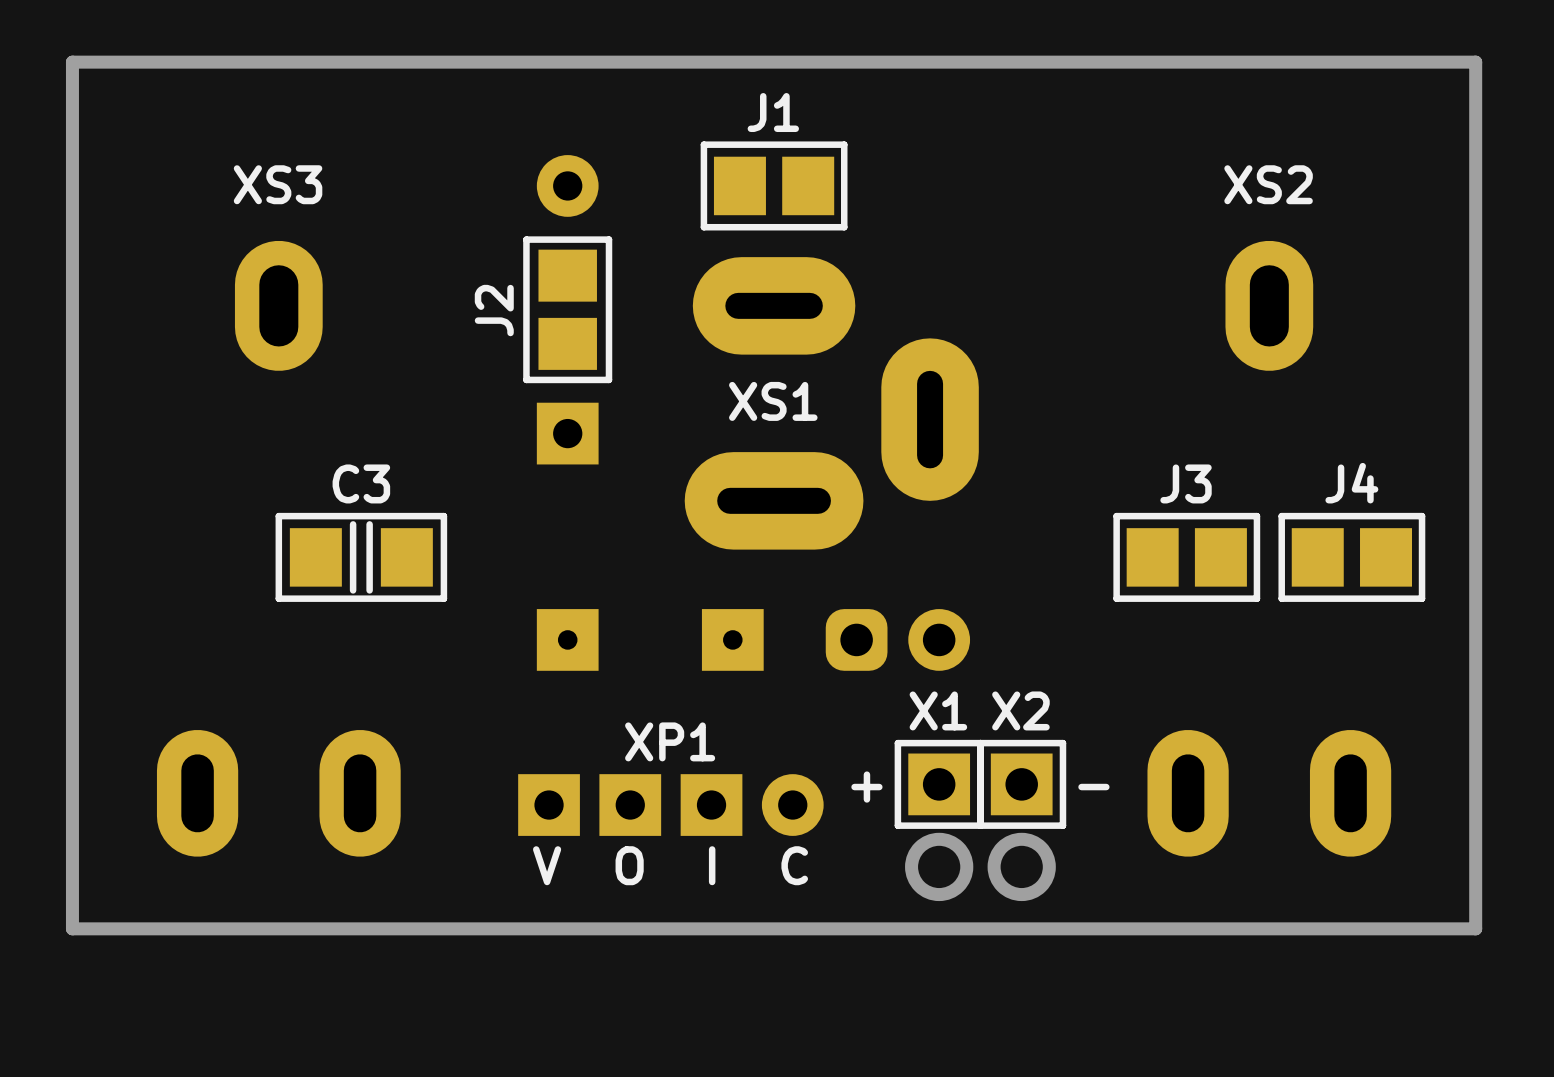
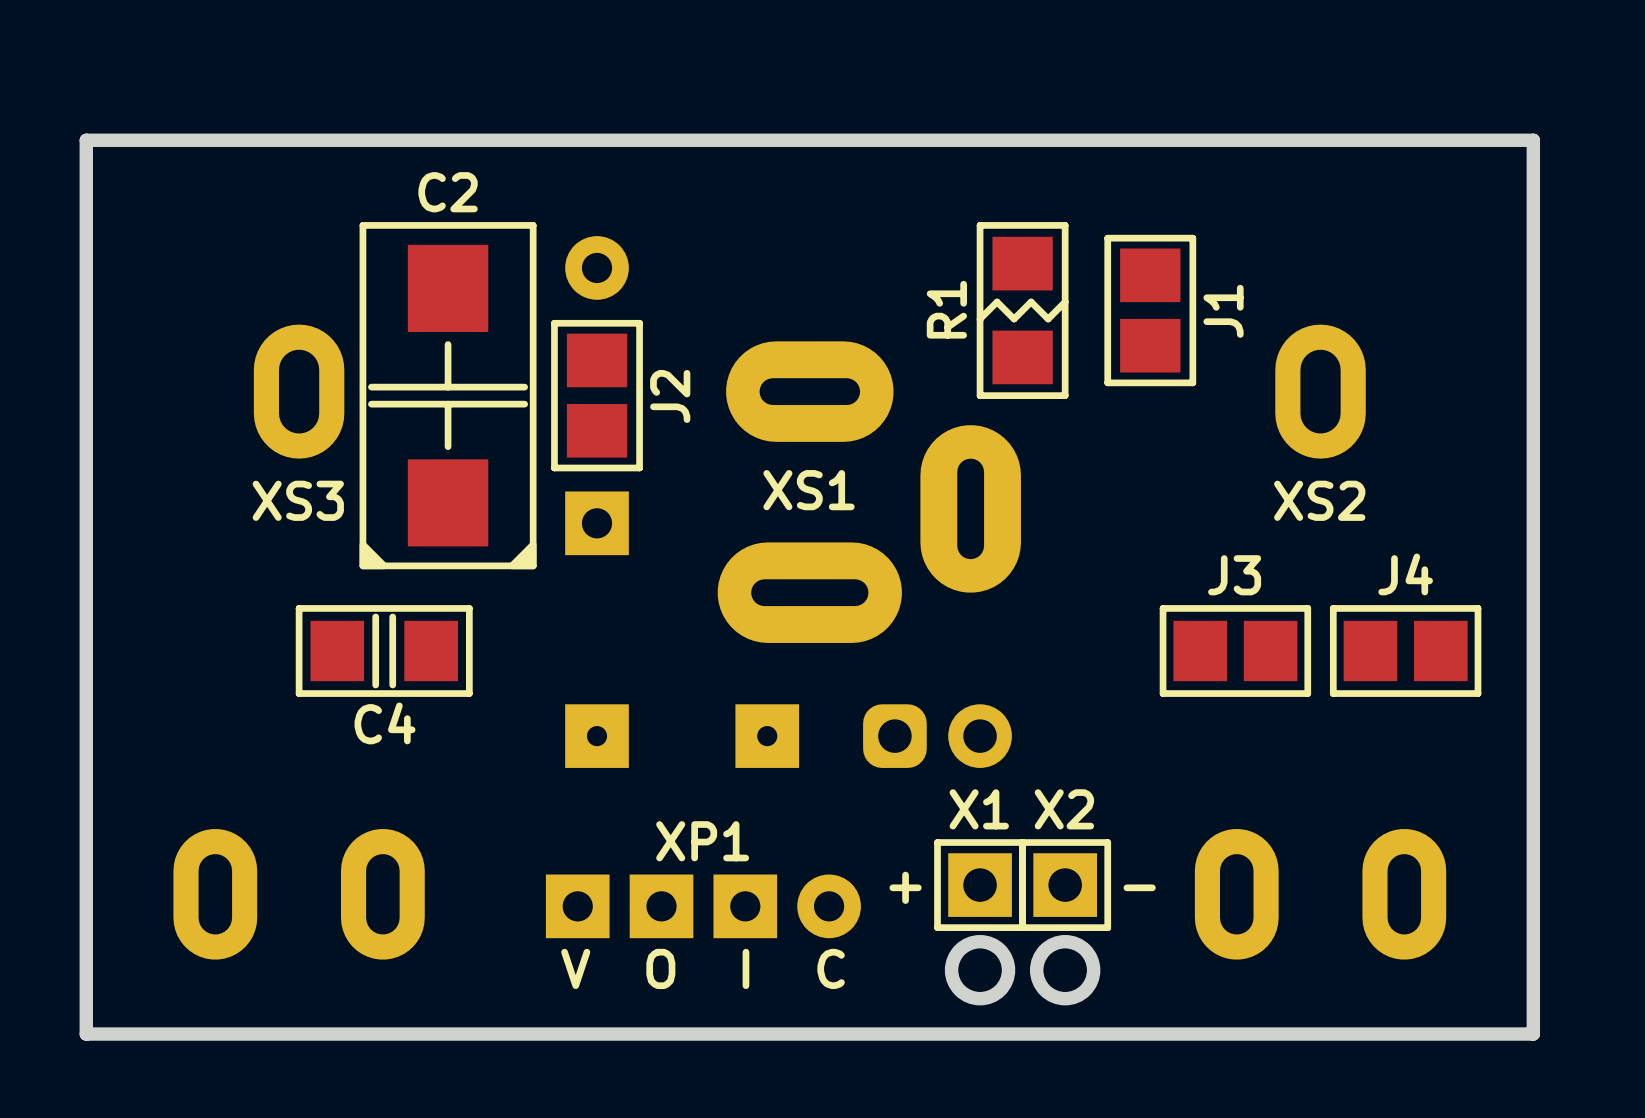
XS3 name position: XS3 (278, 184) -> XS3 (298, 500)
XS2 name position: XS2 (1268, 184) -> XS2 (1319, 500)
J1 rotation: 0° (774, 185) -> 90° clockwise (1150, 310)
J1 position: (774, 185) -> (1150, 310)
R1: none -> (1022, 310)
C2: none -> (448, 395)
J2 name position: J2 (494, 310) -> J2 (670, 396)
C3 name: C3 (361, 483) -> C4 (385, 723)

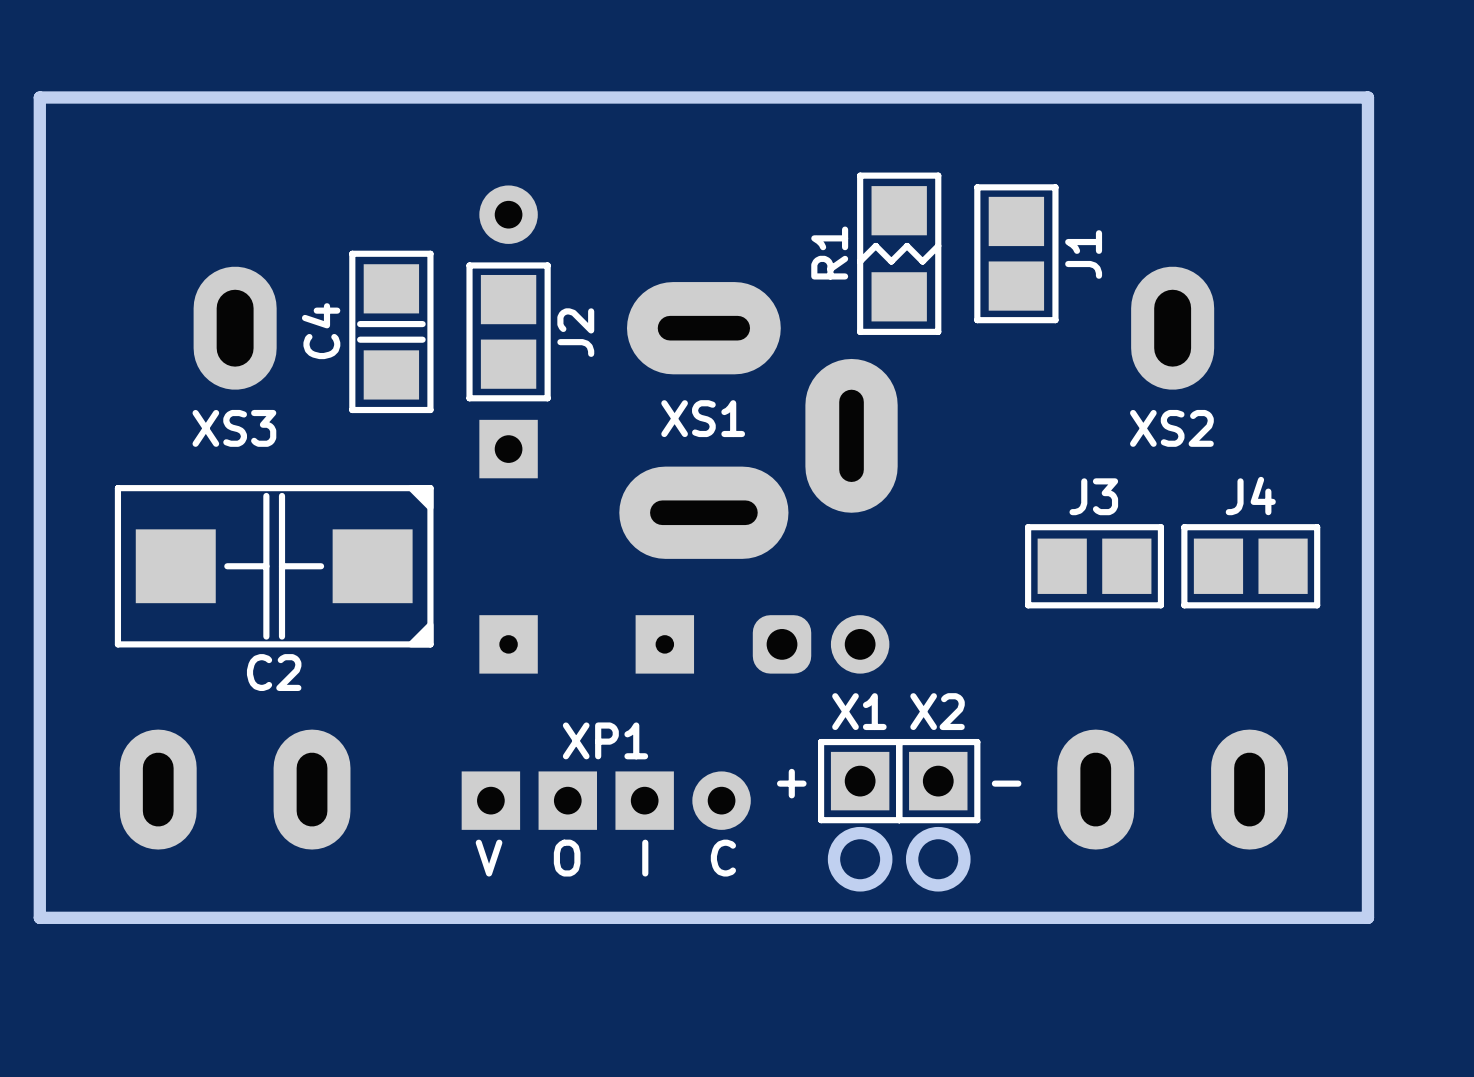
C2 name position: C2 (448, 192) -> C2 (274, 672)
C2 rotation: 0° (448, 395) -> 90° counterclockwise (274, 566)
C2 position: (448, 395) -> (274, 566)
C4 rotation: 0° (384, 650) -> 90° clockwise (391, 331)
C4 position: (384, 650) -> (391, 331)

